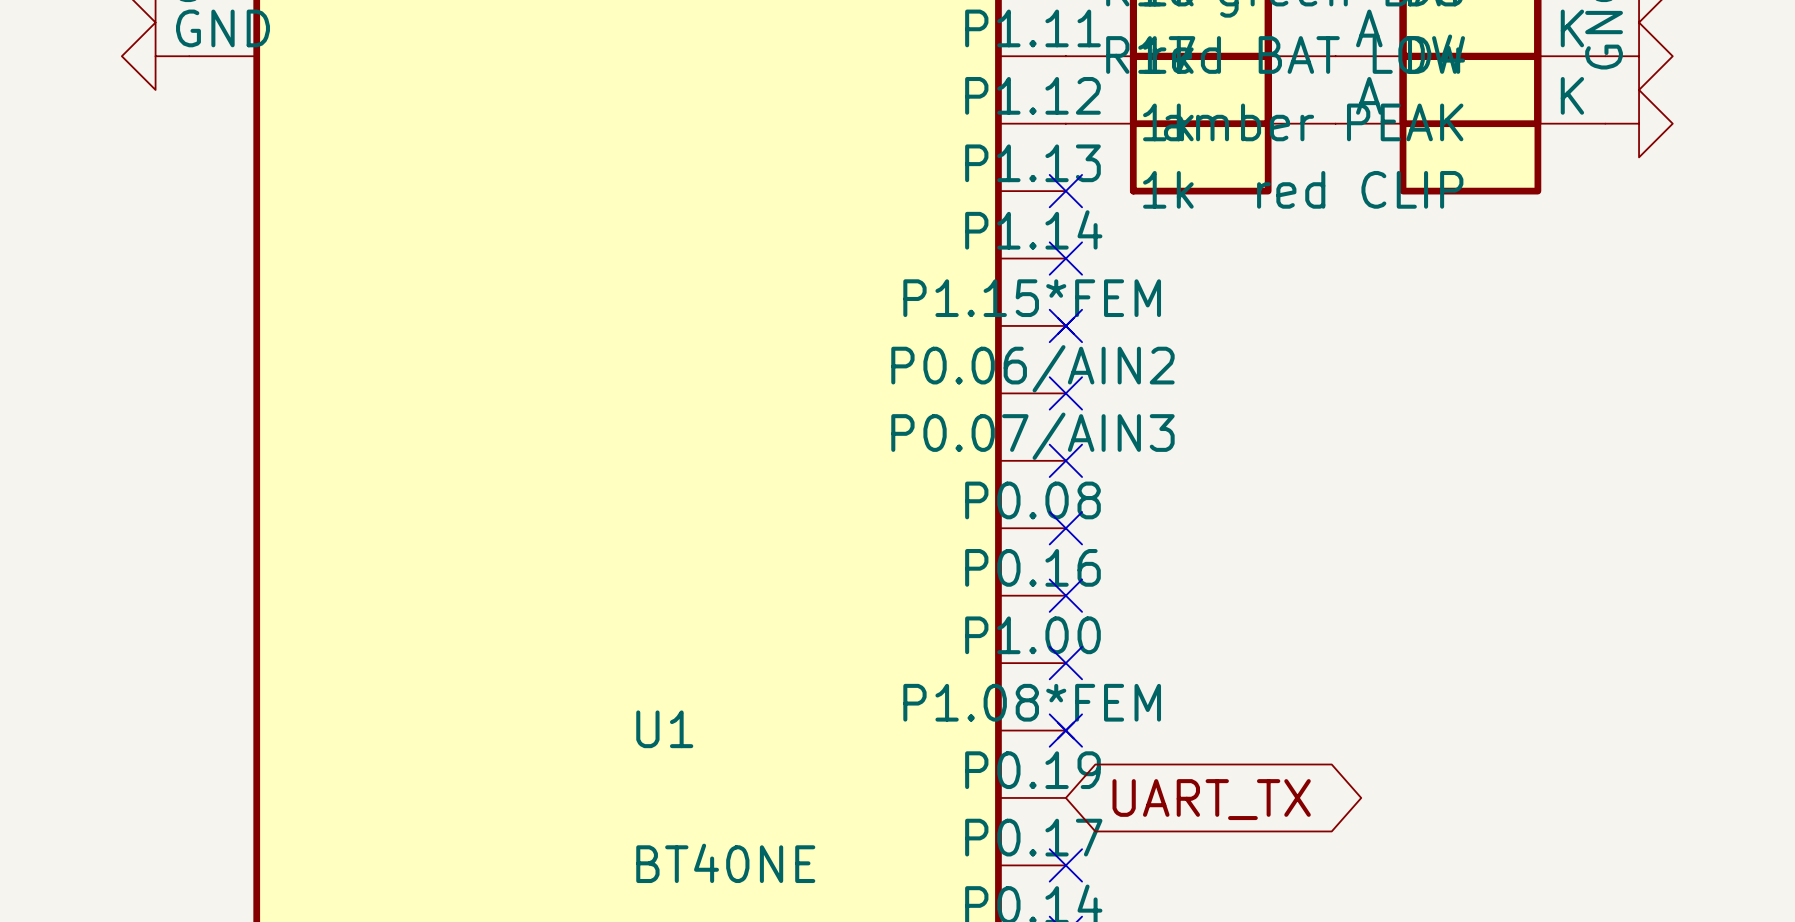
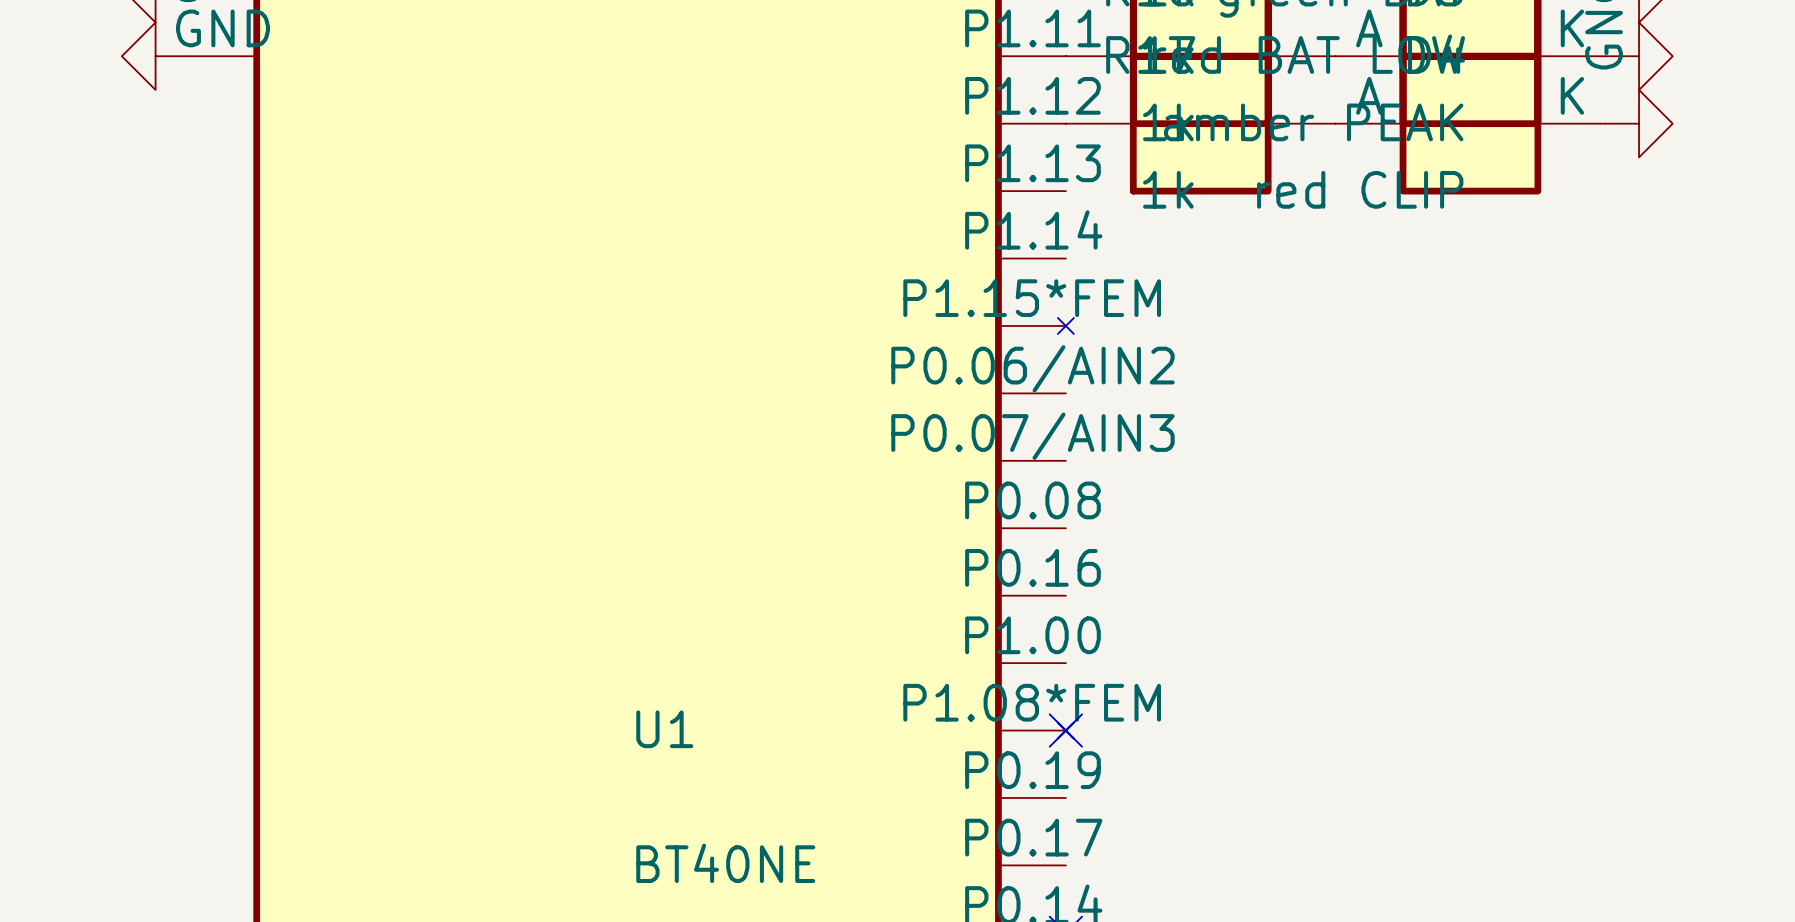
no-connect mark: (1065, 191) -> none
no-connect mark: (1065, 258) -> none
no-connect mark: (1065, 325) -> none
no-connect mark: (1065, 393) -> none
no-connect mark: (1065, 460) -> none
no-connect mark: (1065, 528) -> none
no-connect mark: (1065, 595) -> none
no-connect mark: (1065, 663) -> none
global label: UART_TX (1211, 799) -> none
no-connect mark: (1065, 865) -> none

